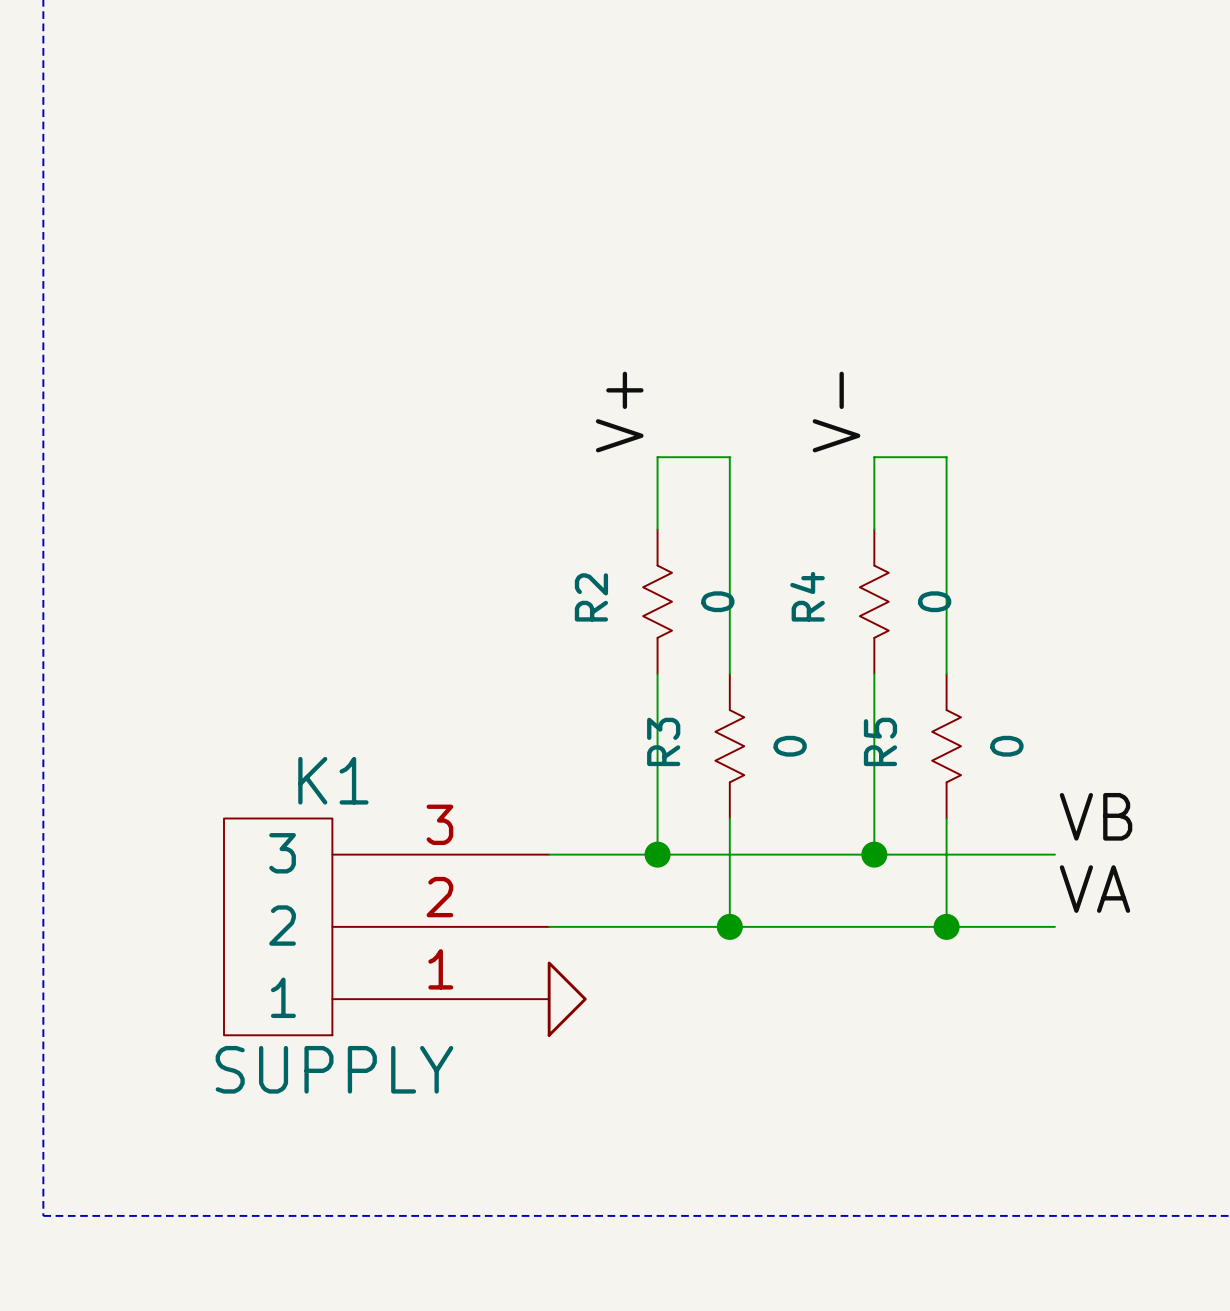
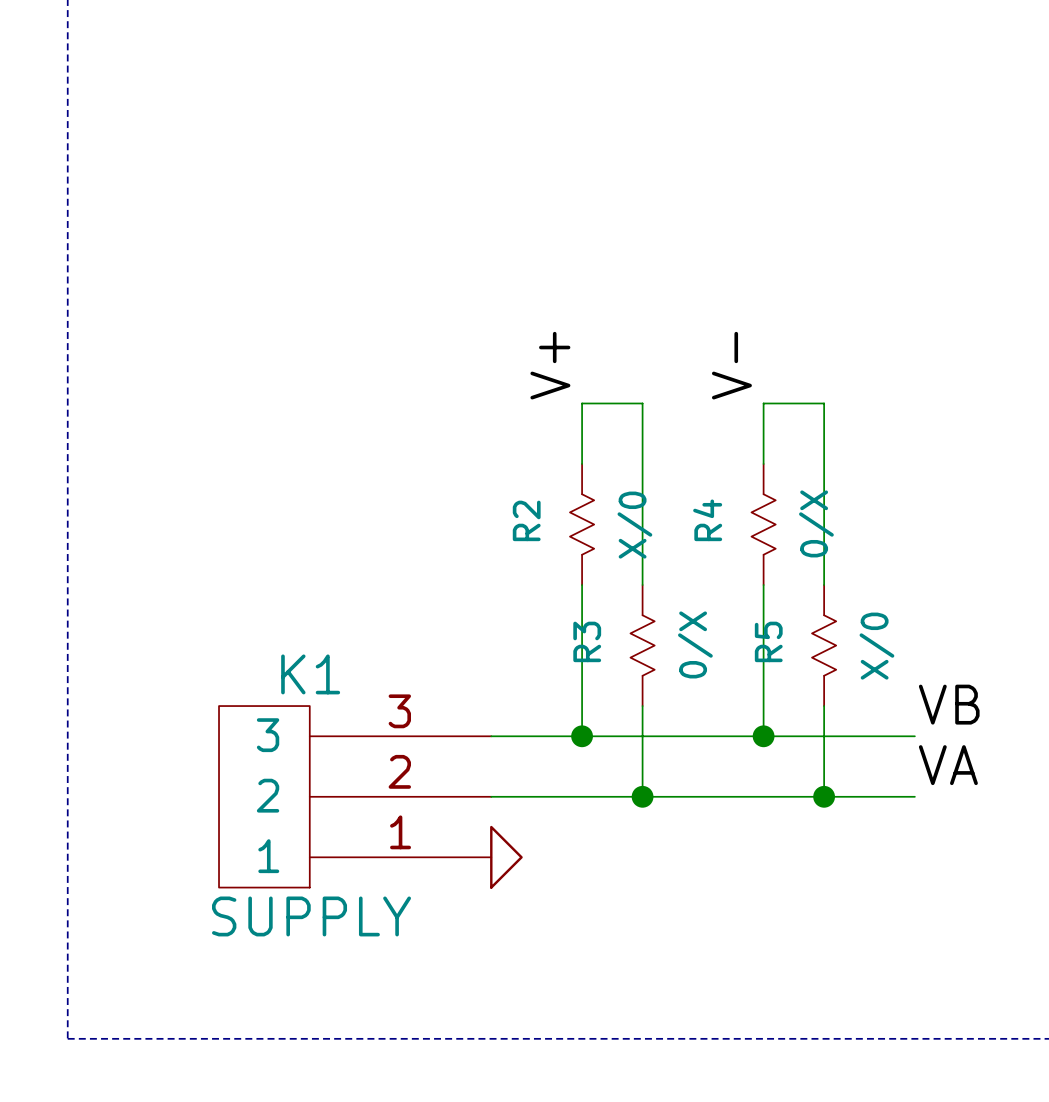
R2 value: 0 (717, 601) -> X/0 (634, 525)
R4 value: 0 (934, 601) -> 0/X (816, 523)
R3 value: 0 (790, 746) -> 0/X (695, 644)
R5 value: 0 (1006, 746) -> X/0 (876, 646)

